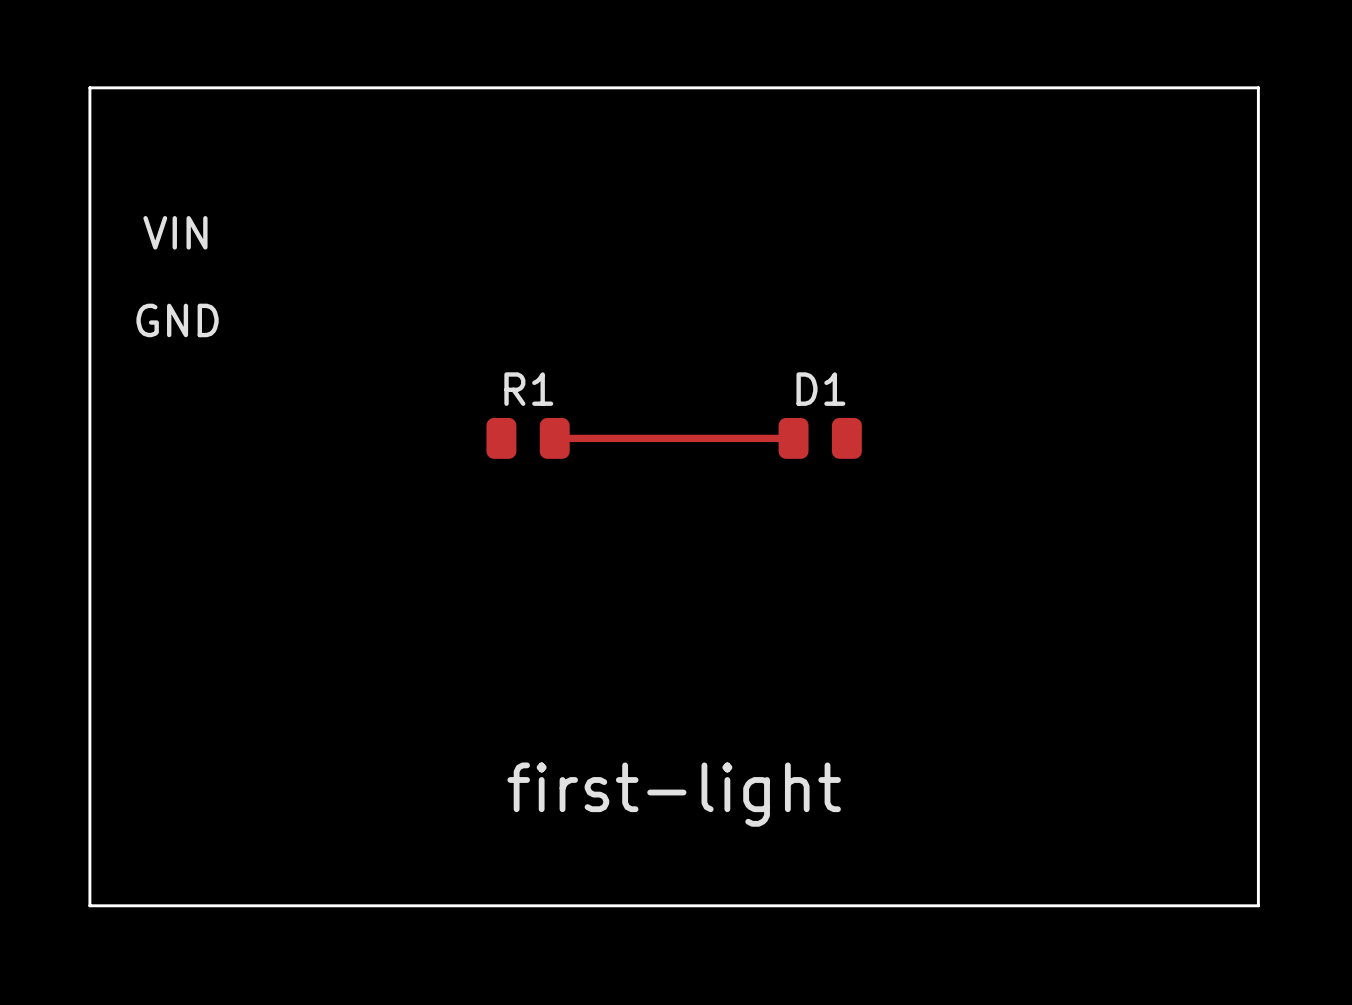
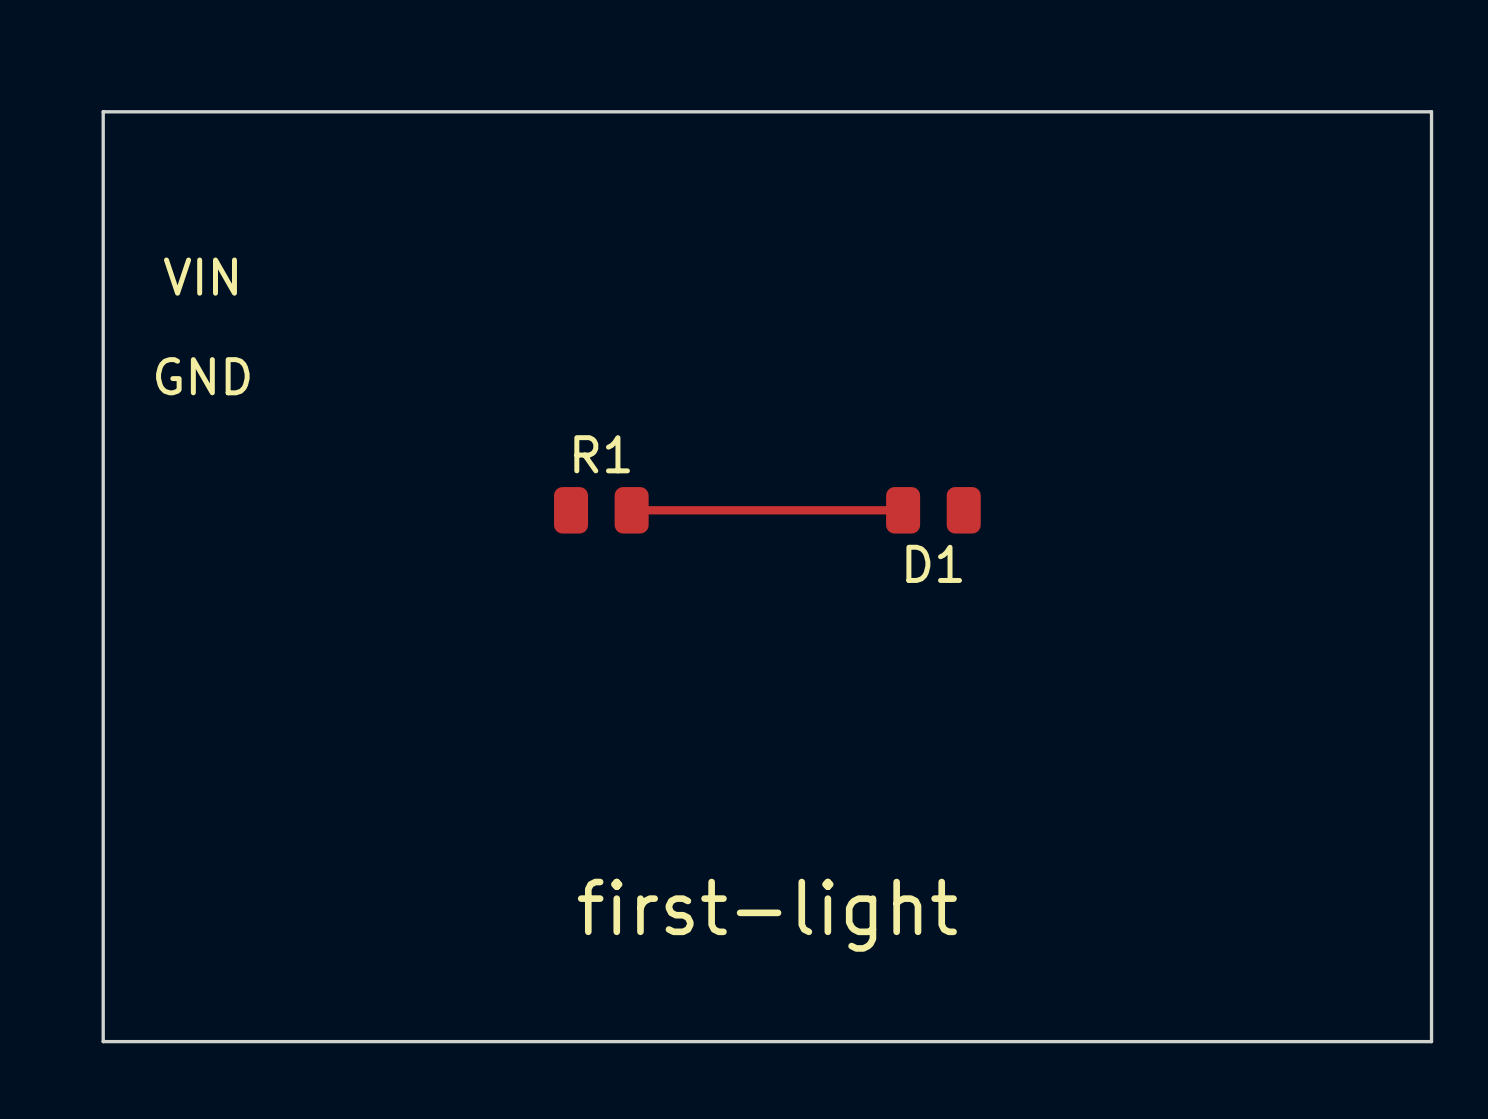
D1 name position: D1 (820, 389) -> D1 (934, 563)

